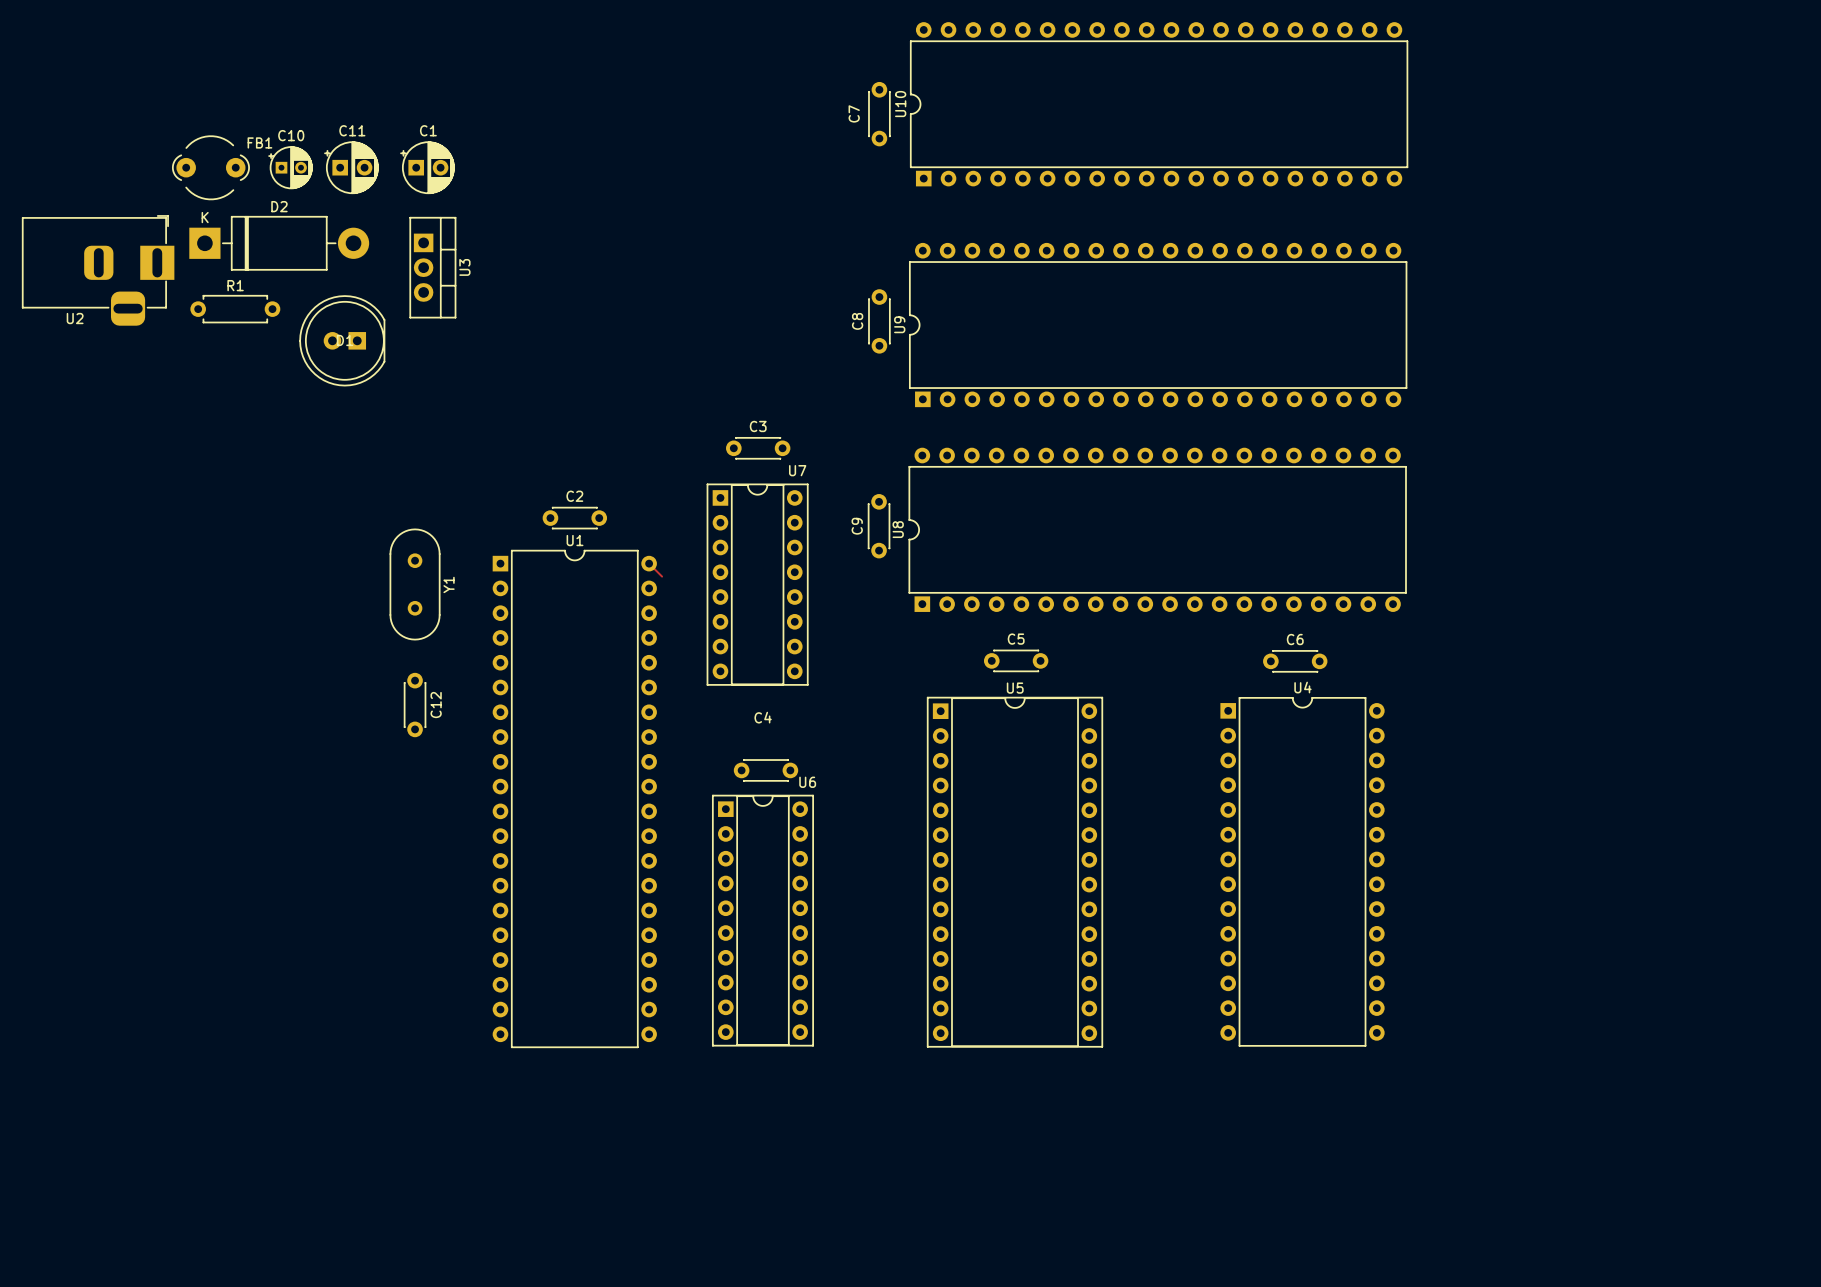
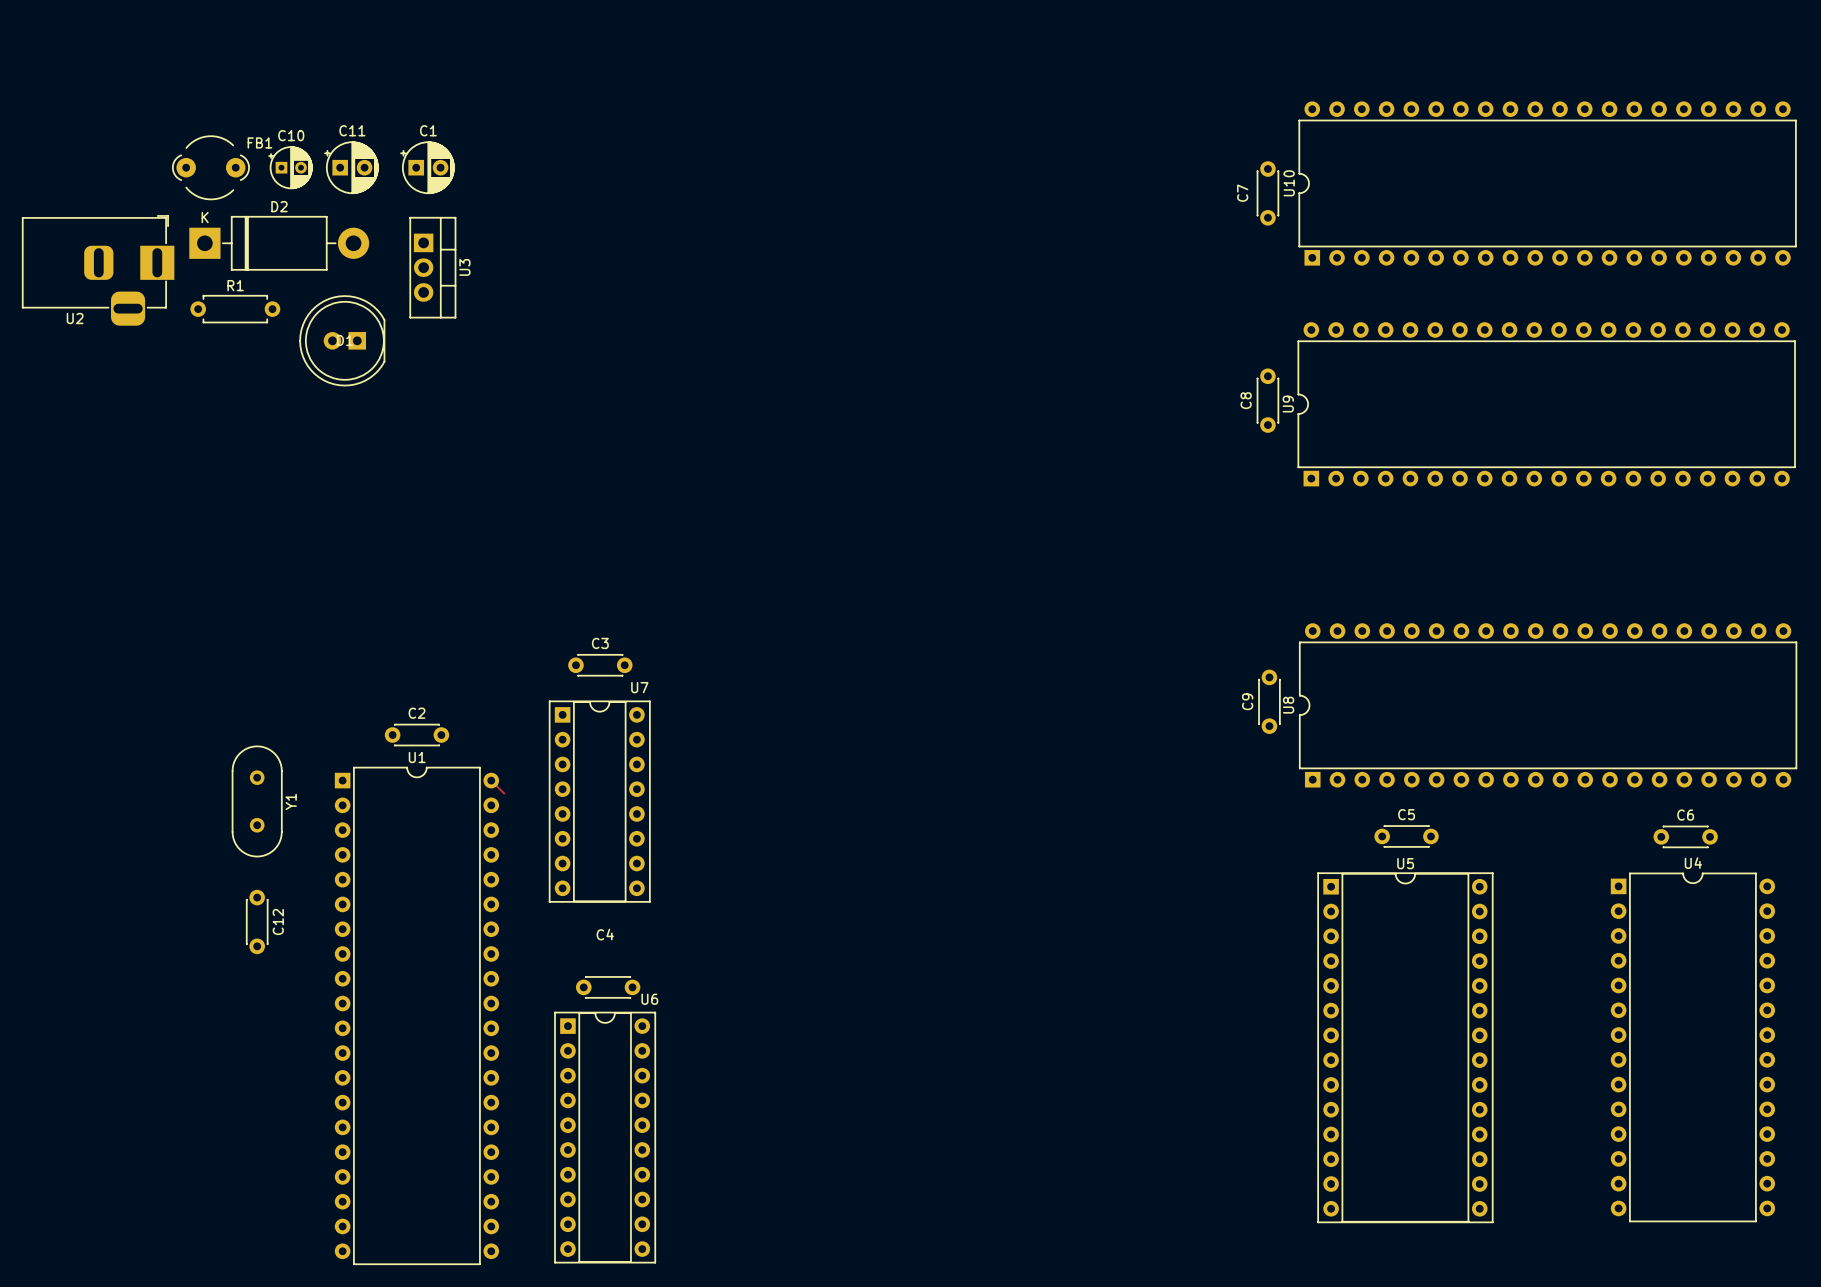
U10 position: (1159, 104) -> (1547, 183)
C7 position: (879, 114) -> (1267, 193)
C8 position: (879, 321) -> (1267, 400)
U9 position: (1158, 325) -> (1546, 404)
C3 position: (758, 448) -> (600, 665)
C2 position: (574, 518) -> (416, 735)
C9 position: (879, 526) -> (1269, 701)
U8 position: (1157, 529) -> (1548, 705)
top track: (649, 563) (662, 576) -> none
Y1 position: (415, 584) -> (257, 801)
U7 position: (757, 584) -> (599, 801)
C5 position: (1016, 660) -> (1406, 836)
C6 position: (1295, 661) -> (1685, 836)
C12 position: (415, 705) -> (257, 921)
C4 position: (766, 770) -> (608, 987)
top track: none -> (491, 780) (504, 793)
U1 position: (574, 798) -> (416, 1015)
U4 position: (1302, 871) -> (1692, 1047)
U5 position: (1014, 872) -> (1405, 1047)
U6 position: (762, 920) -> (605, 1137)

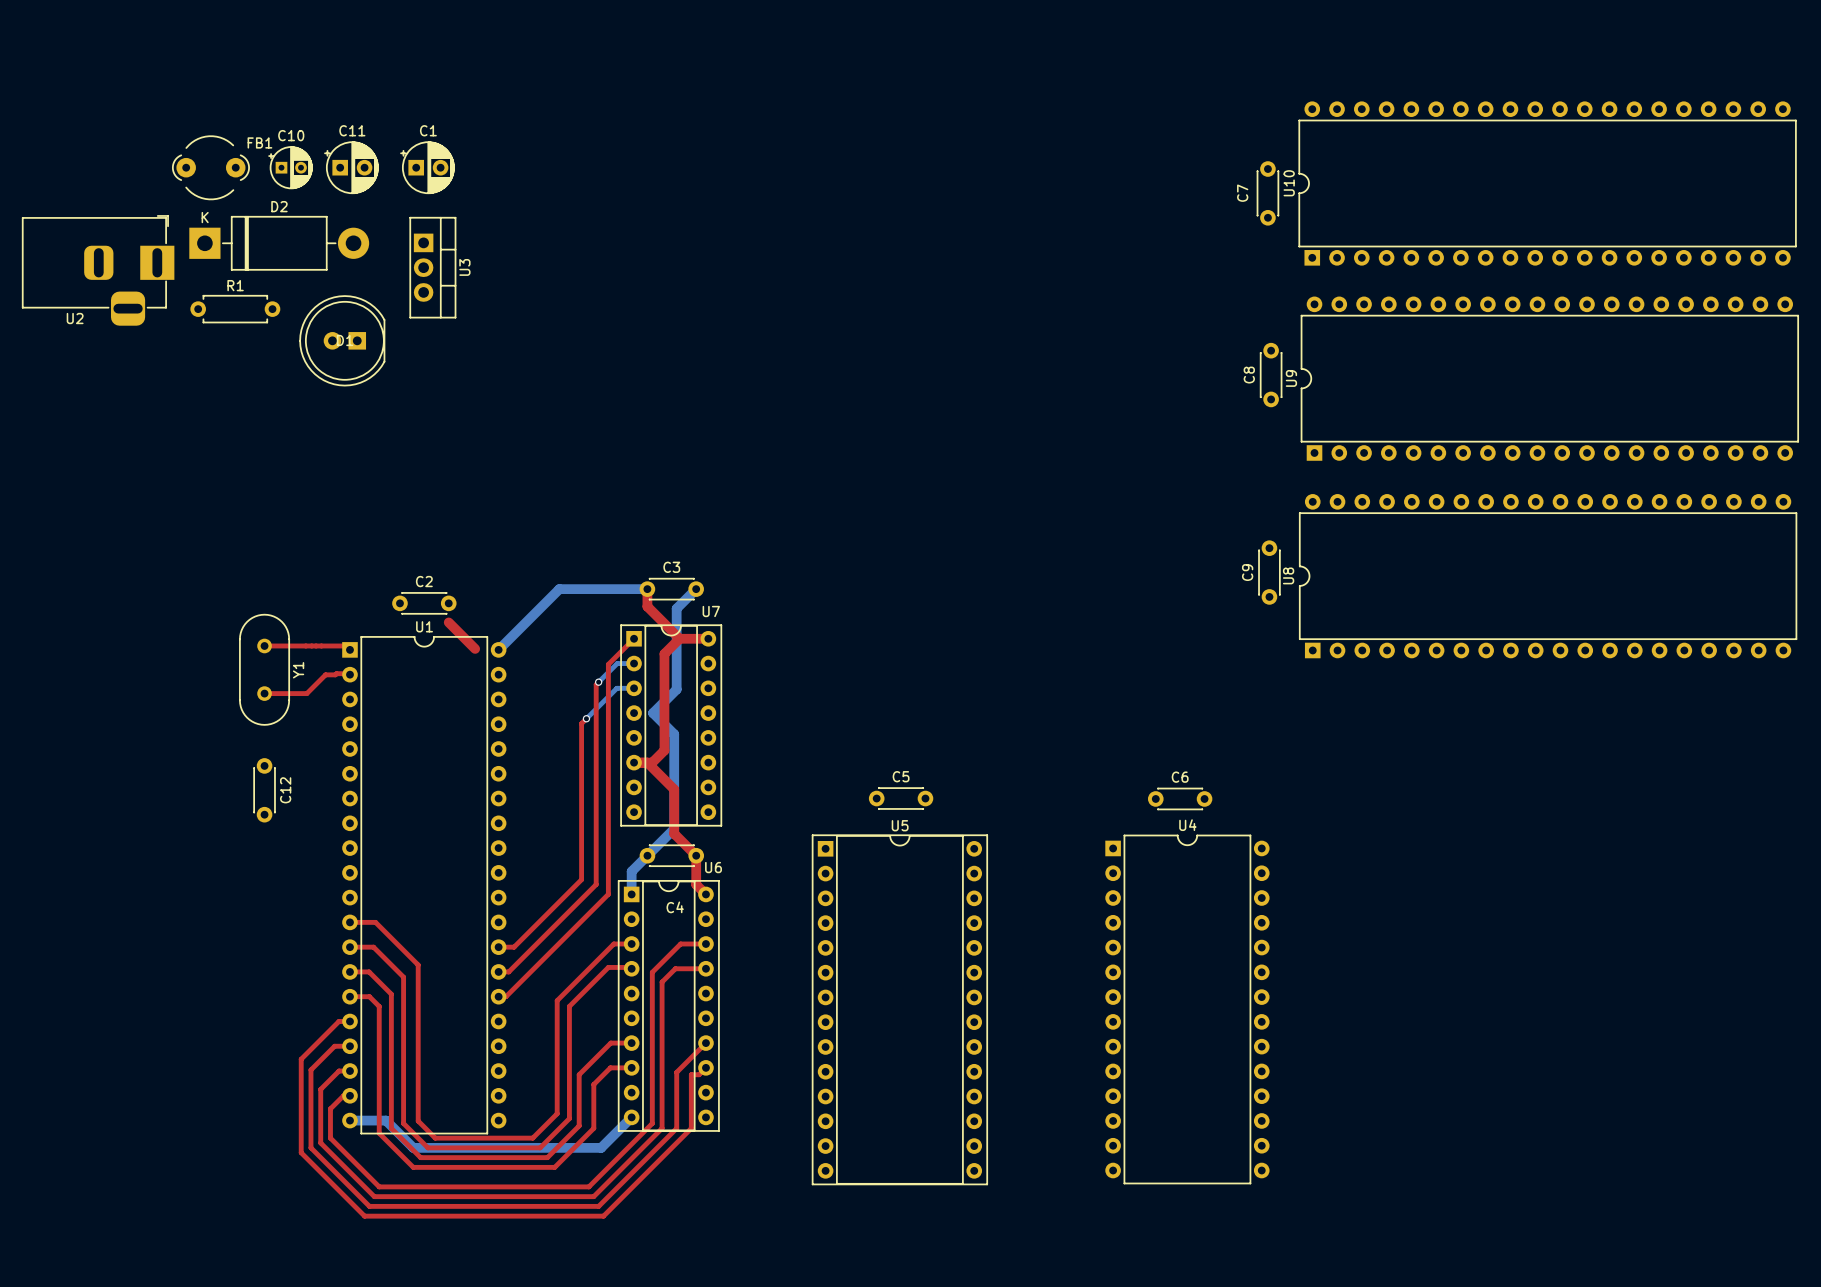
C8 position: (1267, 400) -> (1271, 375)
U9 position: (1546, 404) -> (1549, 378)
top track: none -> (647, 589) (647, 606) (679, 638)
bottom track: none -> (647, 589) (559, 589) (498, 649)
bottom track: none -> (696, 589) (676, 608) (676, 689) (653, 713) (674, 734) (674, 828) (631, 871) (631, 894)
top track: none -> (448, 622) (475, 648)
top track: none -> (634, 638) (608, 664) (608, 894) (505, 996) (498, 996)
top track: none -> (679, 638) (708, 638)
top track: none -> (679, 638) (664, 653) (664, 750) (652, 762) (634, 762)
top track: none -> (264, 645) (347, 645) (349, 648)
bottom track: none -> (634, 663) (617, 663) (598, 682)
C3 position: (600, 665) -> (671, 589)
top track: none -> (349, 673) (325, 674) (306, 693) (264, 693)
top track: none -> (598, 682) (596, 684) (596, 884) (508, 971) (498, 971)
via: none -> (598, 682)
bottom track: none -> (634, 688) (616, 688) (586, 718)
C9 position: (1269, 701) -> (1269, 572)
U8 position: (1548, 705) -> (1548, 576)
top track: none -> (586, 718) (581, 723) (581, 879) (514, 947) (498, 947)
via: none -> (586, 718)
C2 position: (416, 735) -> (424, 603)
top track: none -> (647, 762) (674, 789) (674, 833) (696, 855) (696, 884) (705, 894)
top track: (491, 780) (504, 793) -> none
Y1 position: (257, 801) -> (264, 669)
U7 position: (599, 801) -> (671, 725)
C5 position: (1406, 836) -> (901, 798)
C6 position: (1685, 836) -> (1180, 798)
C12 position: (257, 921) -> (264, 790)
top track: none -> (349, 922) (375, 922) (418, 965) (418, 1121) (435, 1138) (532, 1138) (557, 1113) (557, 1000) (613, 943) (631, 943)
C4 name position: C4 (605, 934) -> C4 (675, 907)
top track: none -> (705, 943) (680, 943) (652, 972) (652, 1123) (588, 1186) (379, 1186) (330, 1138) (330, 1108) (343, 1095) (349, 1095)
top track: none -> (349, 947) (373, 947) (403, 977) (403, 1123) (427, 1147) (540, 1147) (569, 1118) (569, 1006) (608, 967) (631, 968)
top track: none -> (705, 968) (675, 968) (662, 982) (662, 1128) (593, 1196) (374, 1196) (320, 1143) (320, 1089) (339, 1071) (349, 1071)
top track: none -> (349, 971) (369, 971) (391, 994) (391, 1128) (420, 1157) (547, 1157) (579, 1125) (579, 1074) (610, 1043) (631, 1043)
C4 position: (608, 987) -> (671, 855)
top track: none -> (349, 996) (369, 996) (379, 1006) (379, 1133) (413, 1167) (554, 1167) (593, 1128) (593, 1084) (610, 1067) (631, 1067)
U1 position: (416, 1015) -> (424, 885)
top track: none -> (349, 1021) (338, 1021) (301, 1059) (301, 1152) (364, 1216) (603, 1216) (691, 1128) (691, 1074) (699, 1074) (705, 1067)
top track: none -> (705, 1043) (676, 1072) (676, 1128) (598, 1206) (369, 1206) (310, 1147) (310, 1069) (334, 1046) (349, 1046)
U5 position: (1405, 1047) -> (899, 1009)
U4 position: (1692, 1047) -> (1187, 1009)
bottom track: none -> (631, 1117) (601, 1147) (413, 1147) (386, 1120) (349, 1120)
U6 position: (605, 1137) -> (668, 1005)

